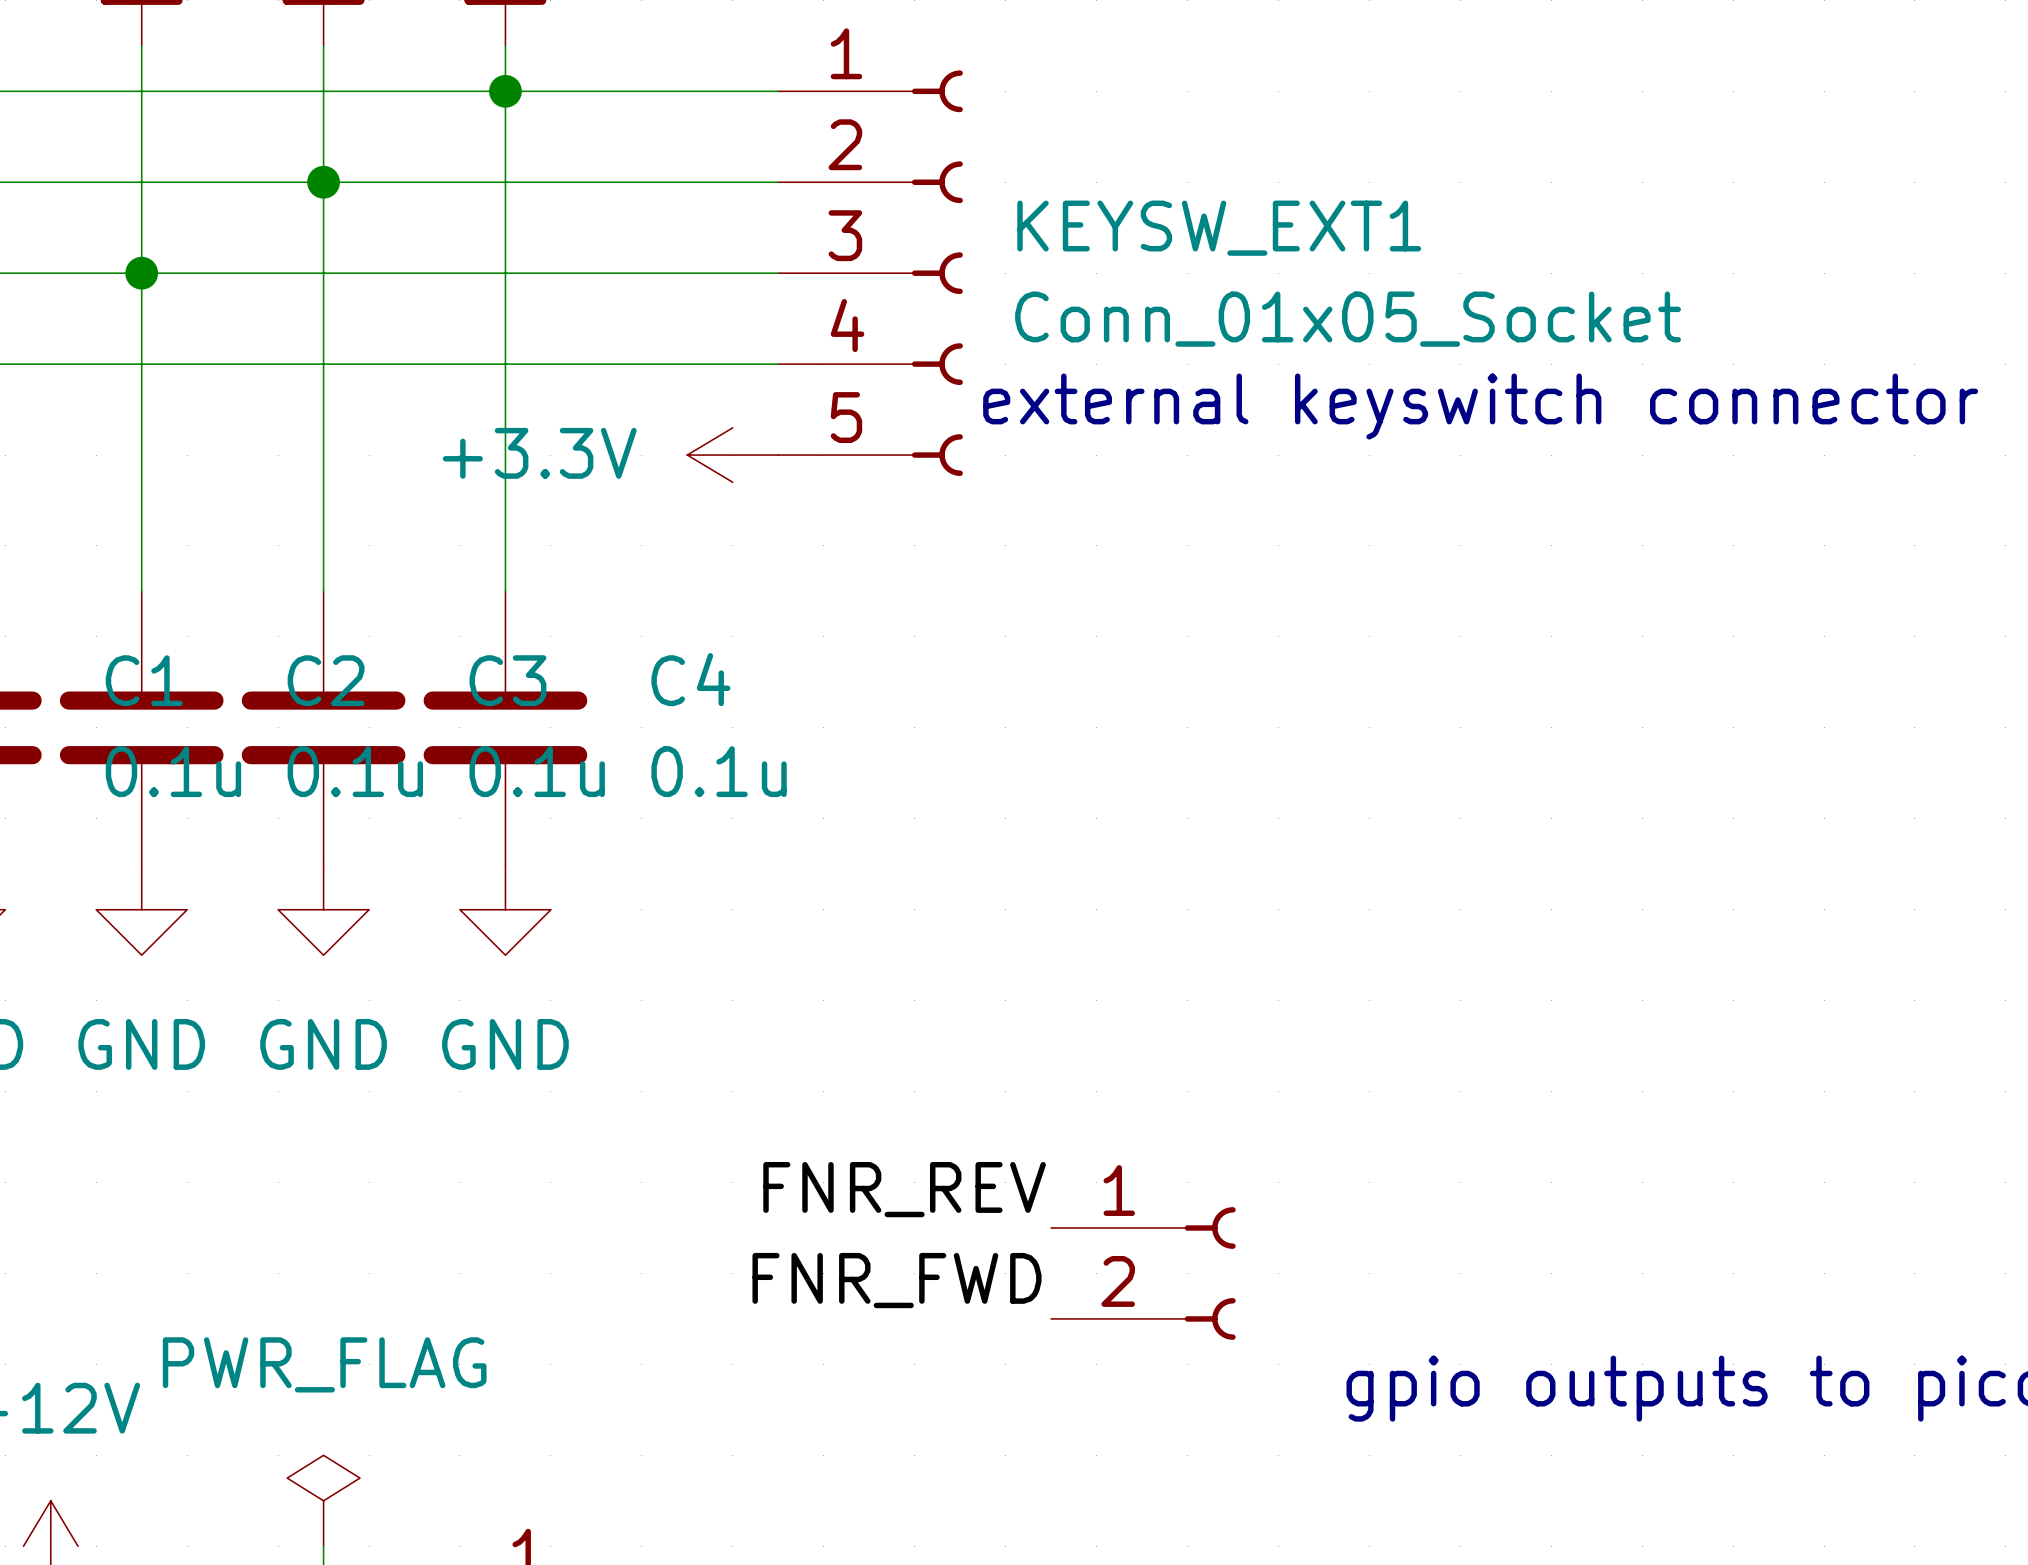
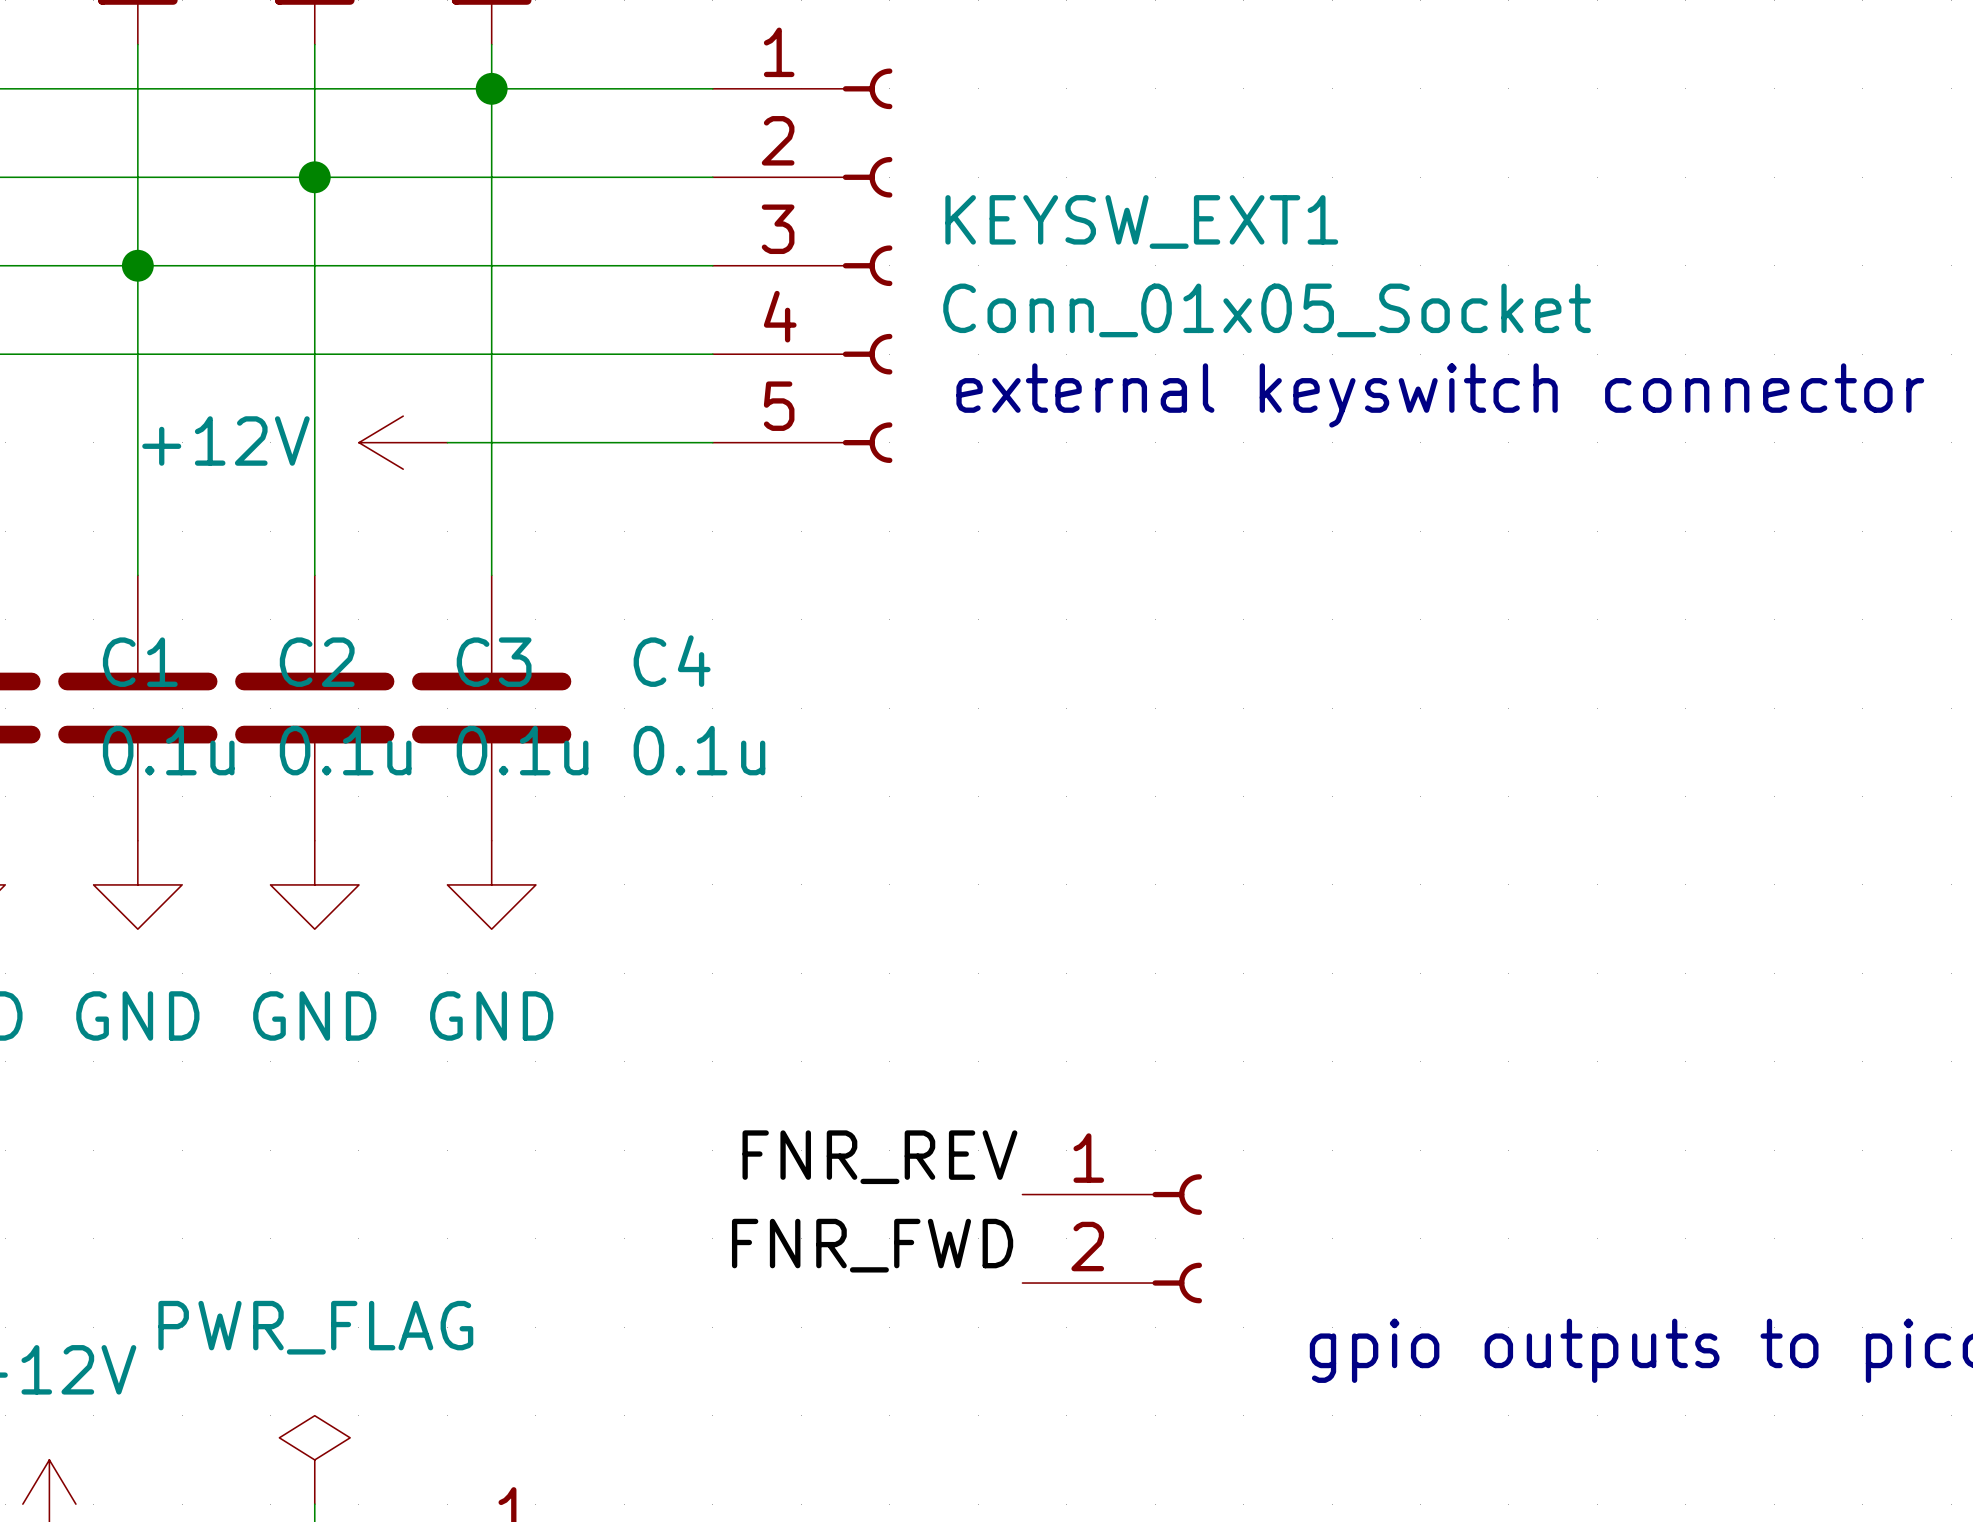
KEYSW_EXT1 position: (870, 273) -> (802, 265)
power symbol: none -> +12V (403, 442)
wire: none -> (447, 442) (712, 442)
power symbol: +3.3V (732, 455) -> none

